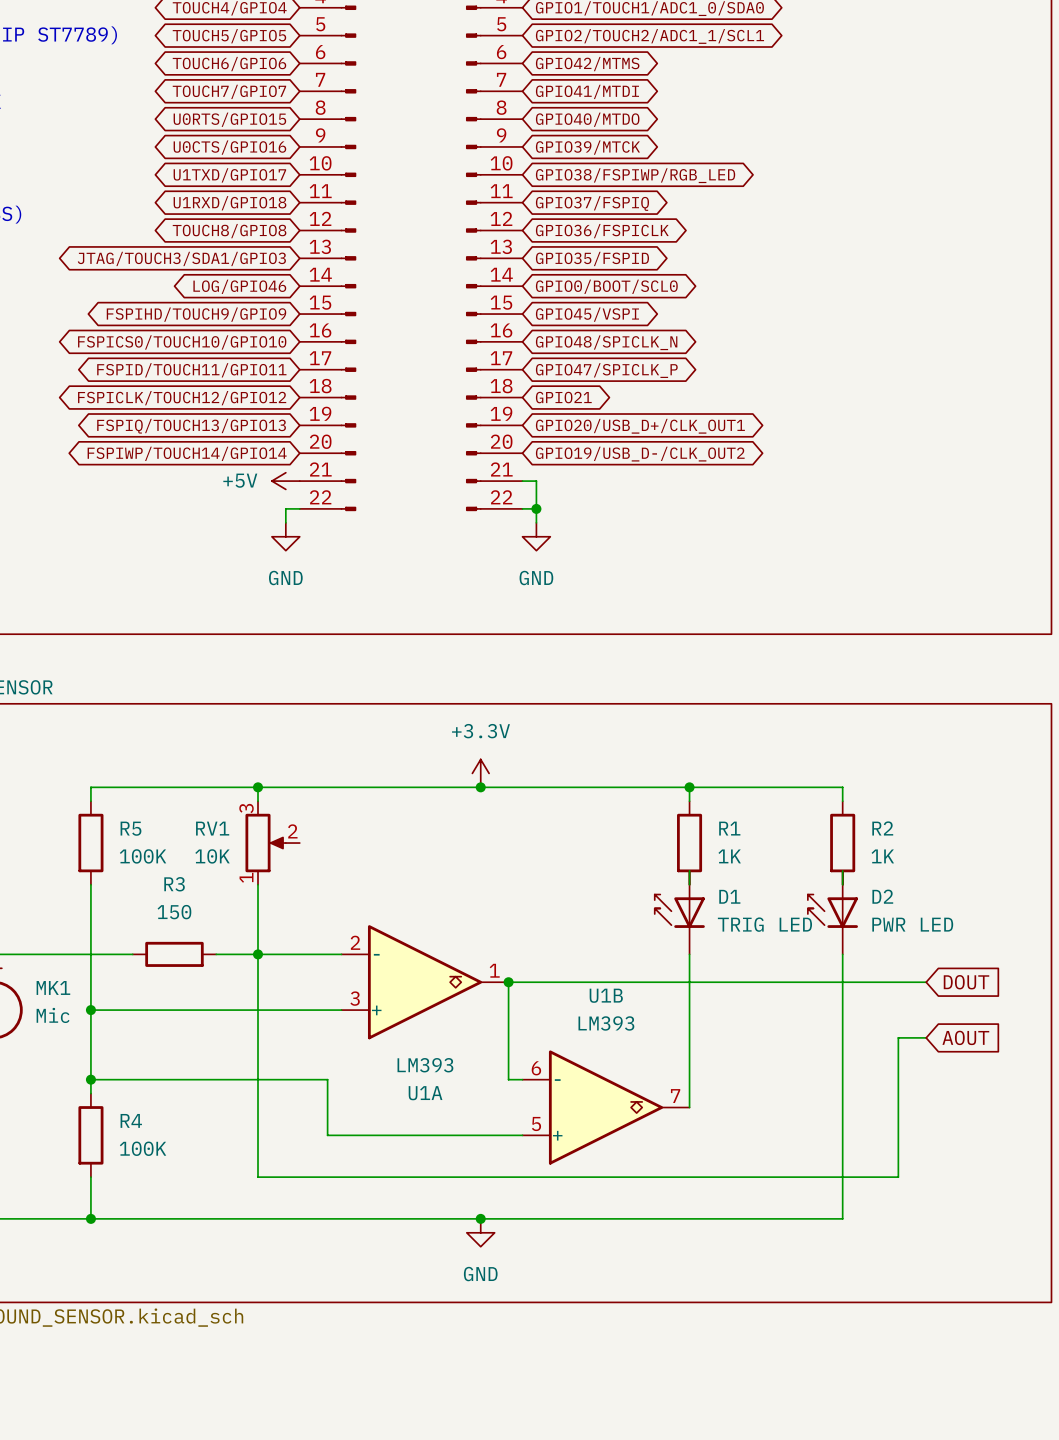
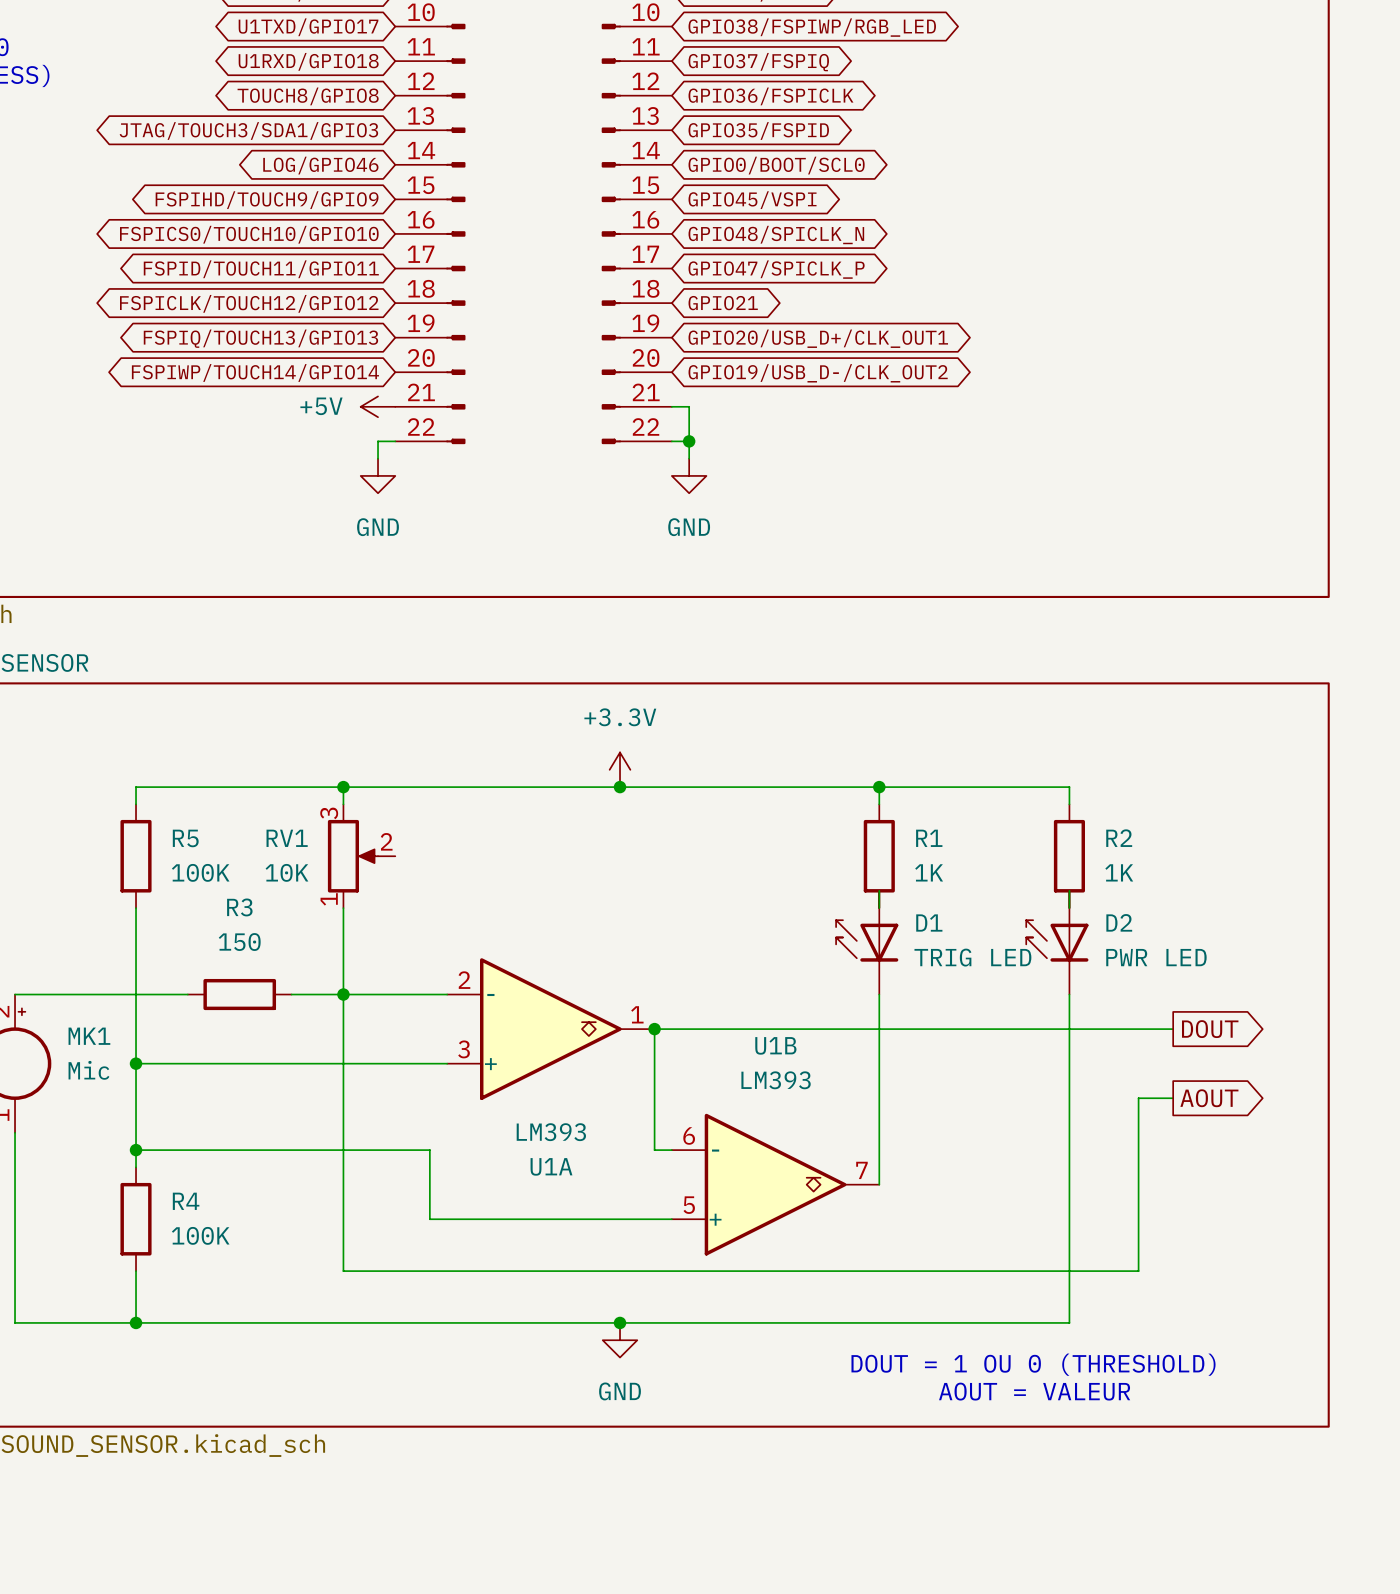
global label shape: input (966, 982) -> output (1210, 1029)
global label shape: input (965, 1037) -> output (1209, 1098)
text: none -> DOUT = 1 OU 0 (THRESHOLD) (1033, 1364)
text: none -> AOUT = VALEUR (1034, 1391)

